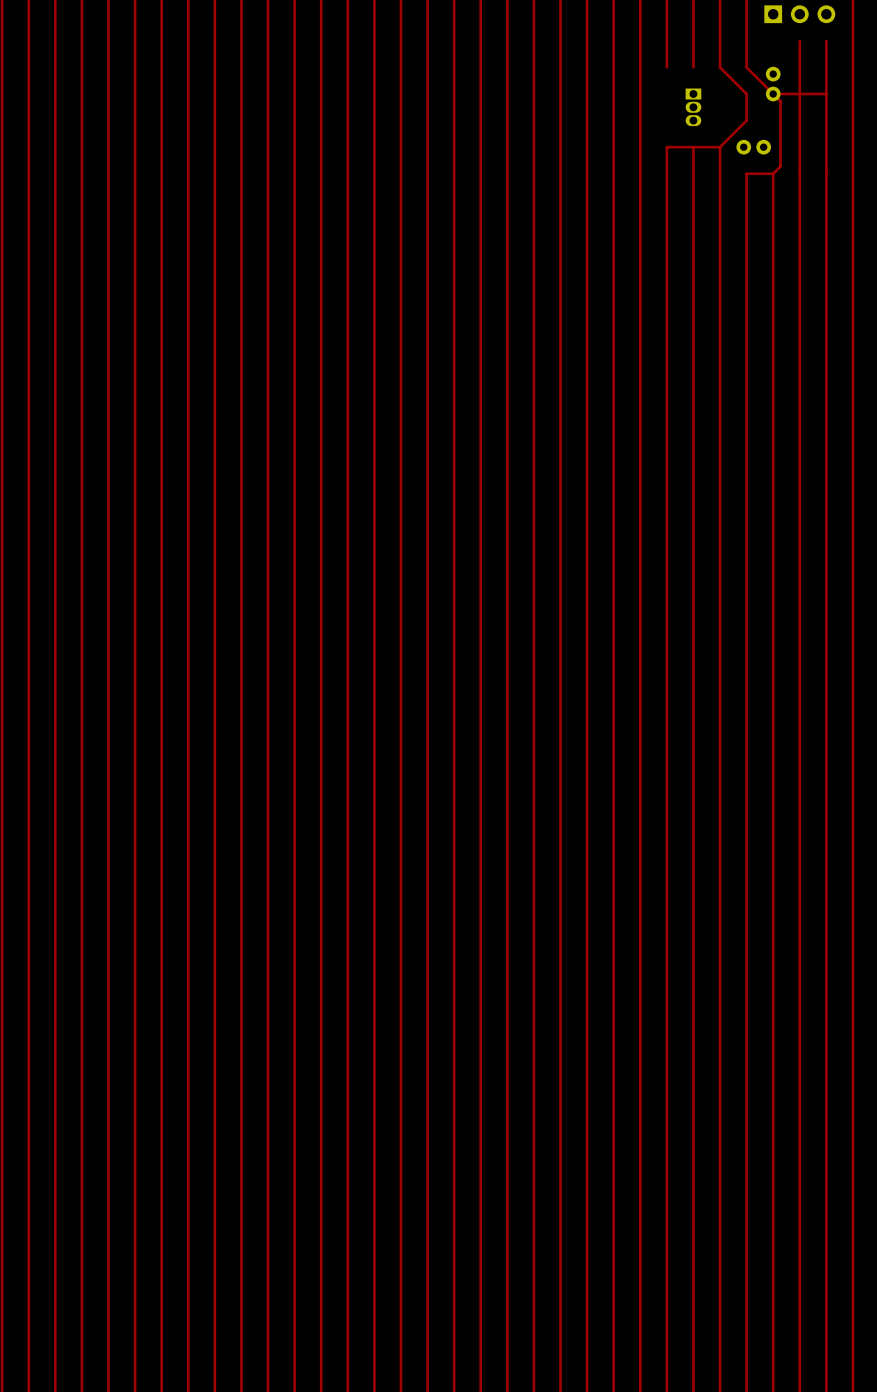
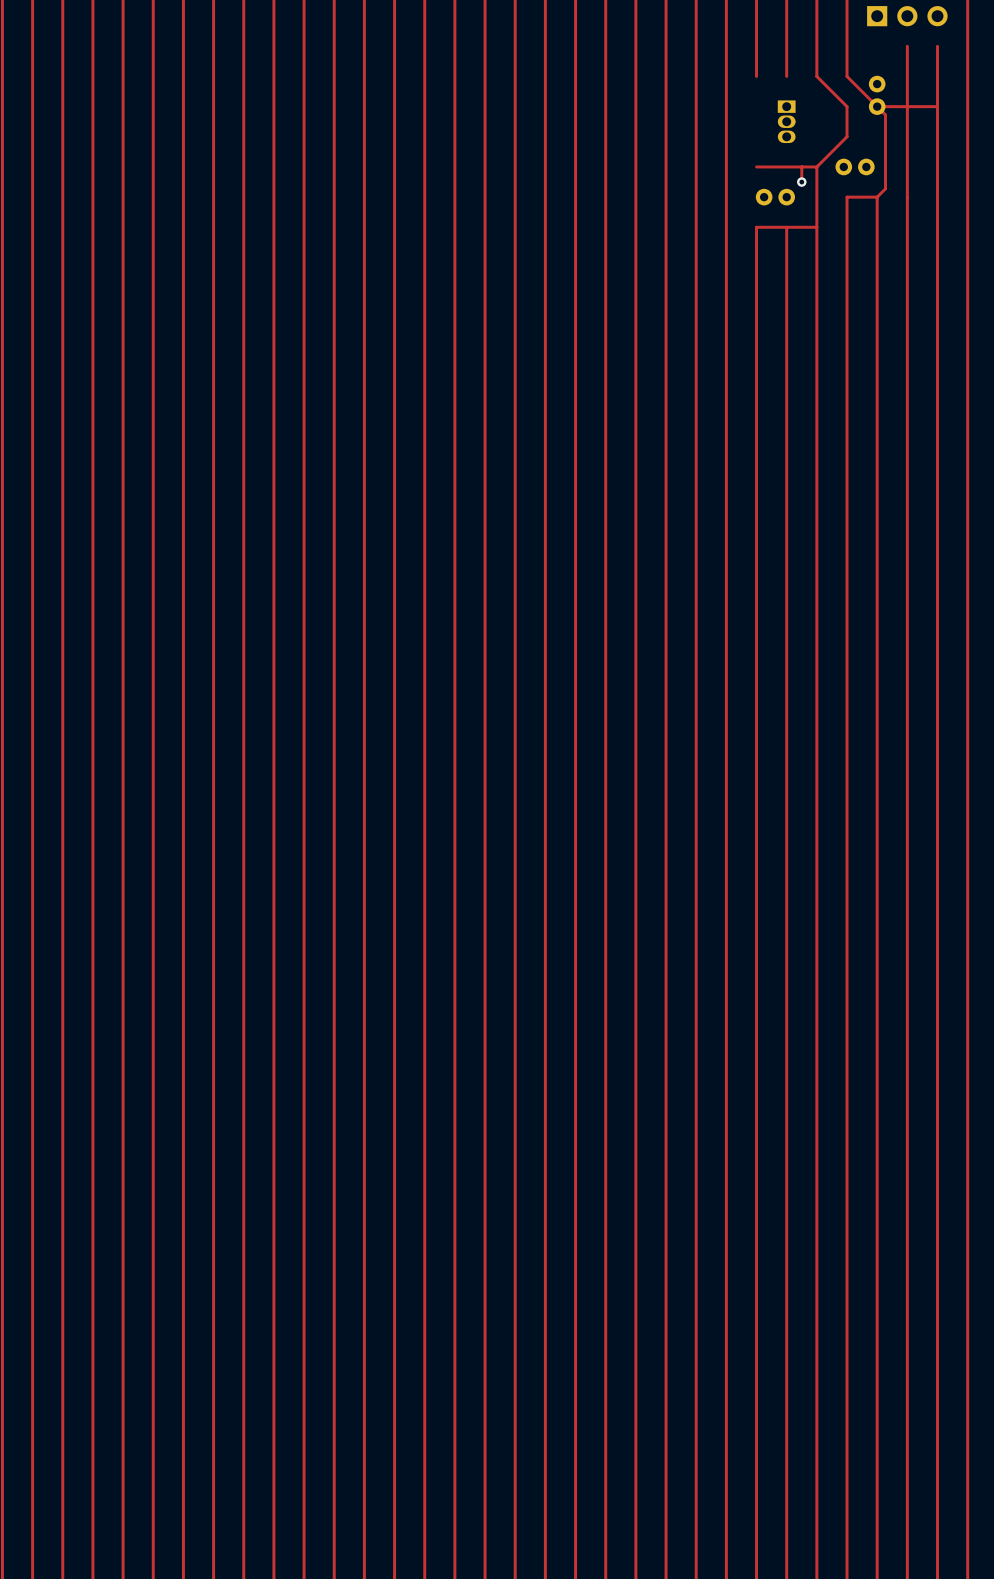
track: (666, 147) (666, 200) -> (816, 227) (756, 227)
track: (693, 147) (693, 200) -> none
track: none -> (801, 166) (801, 182)
via: none -> (801, 182)
part: none -> (775, 197)

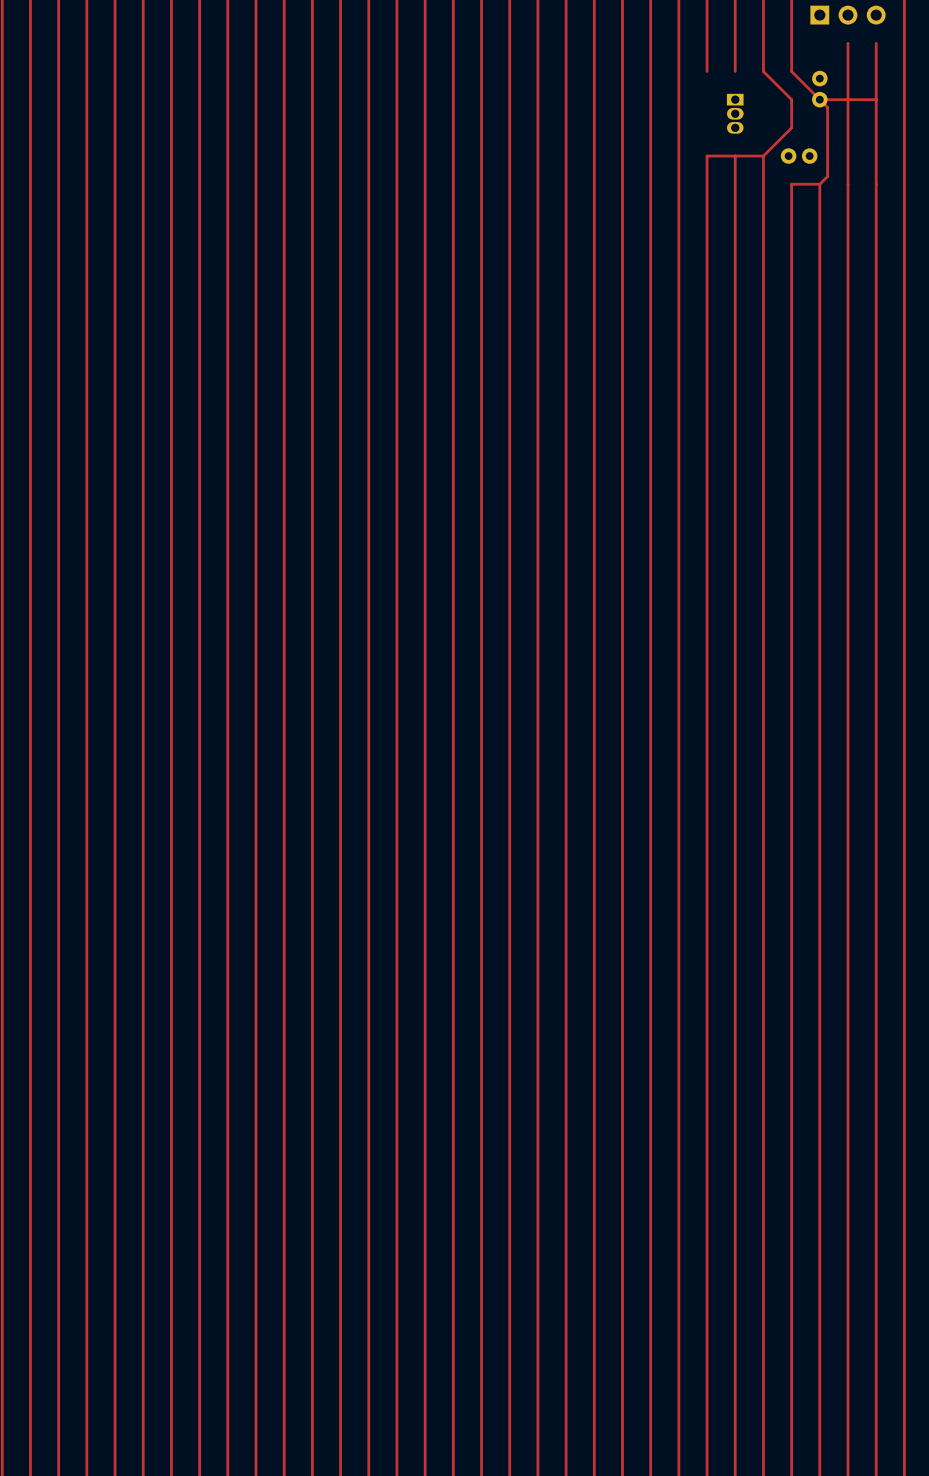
track: none -> (735, 156) (735, 212)
track: (801, 166) (801, 182) -> none
via: (801, 182) -> none
part: (775, 197) -> none
track: (756, 227) (816, 227) -> (707, 212) (707, 156)

